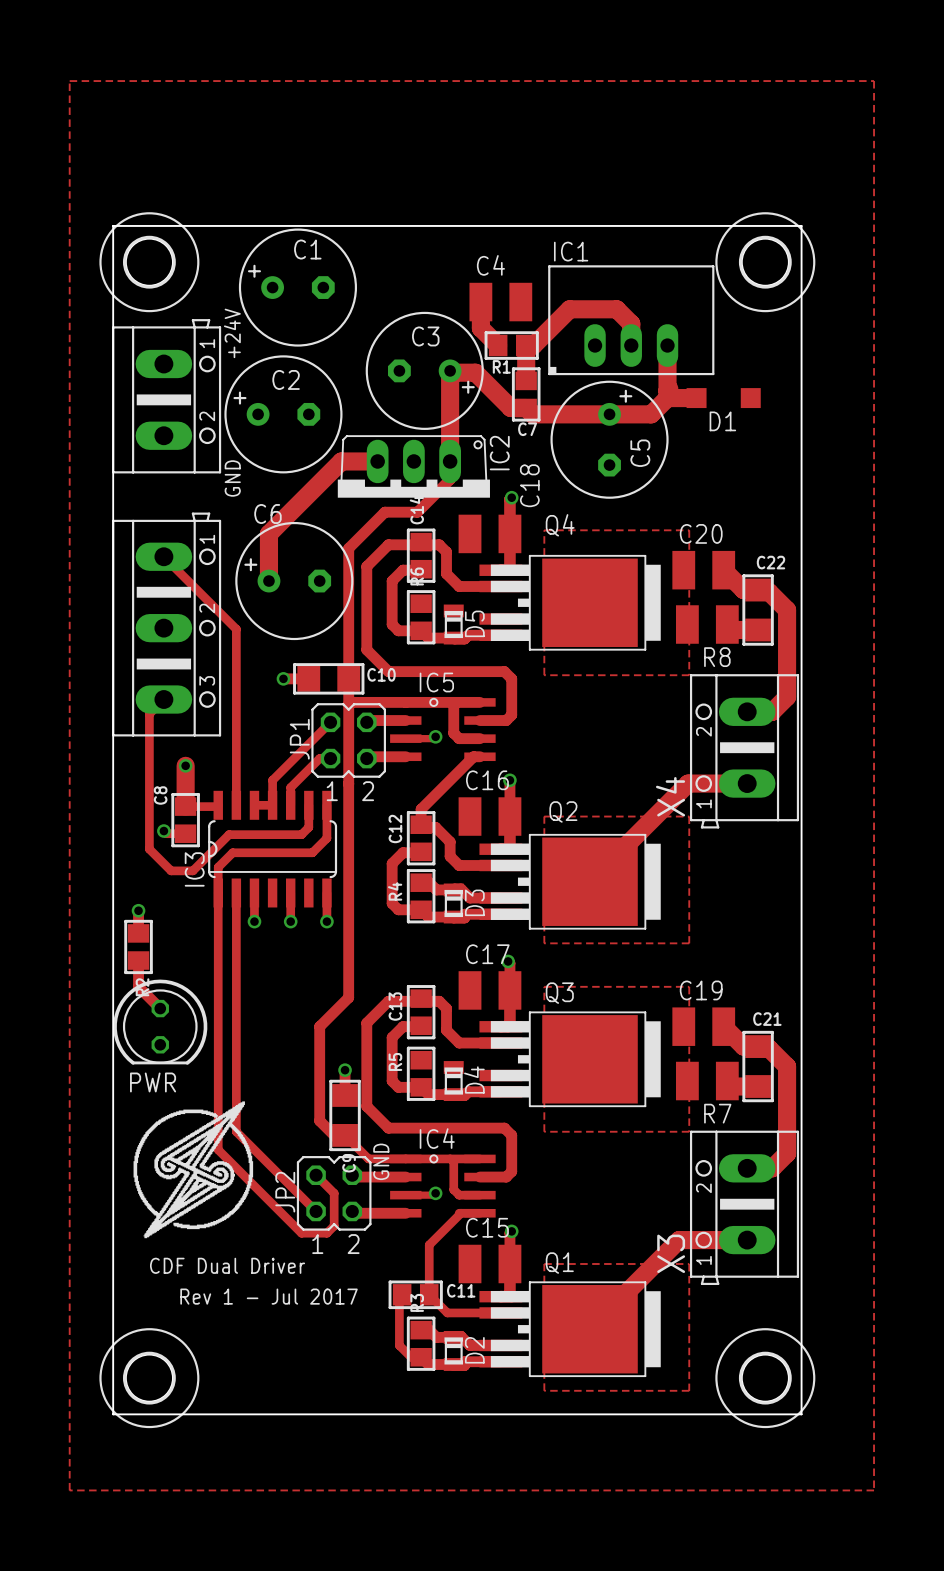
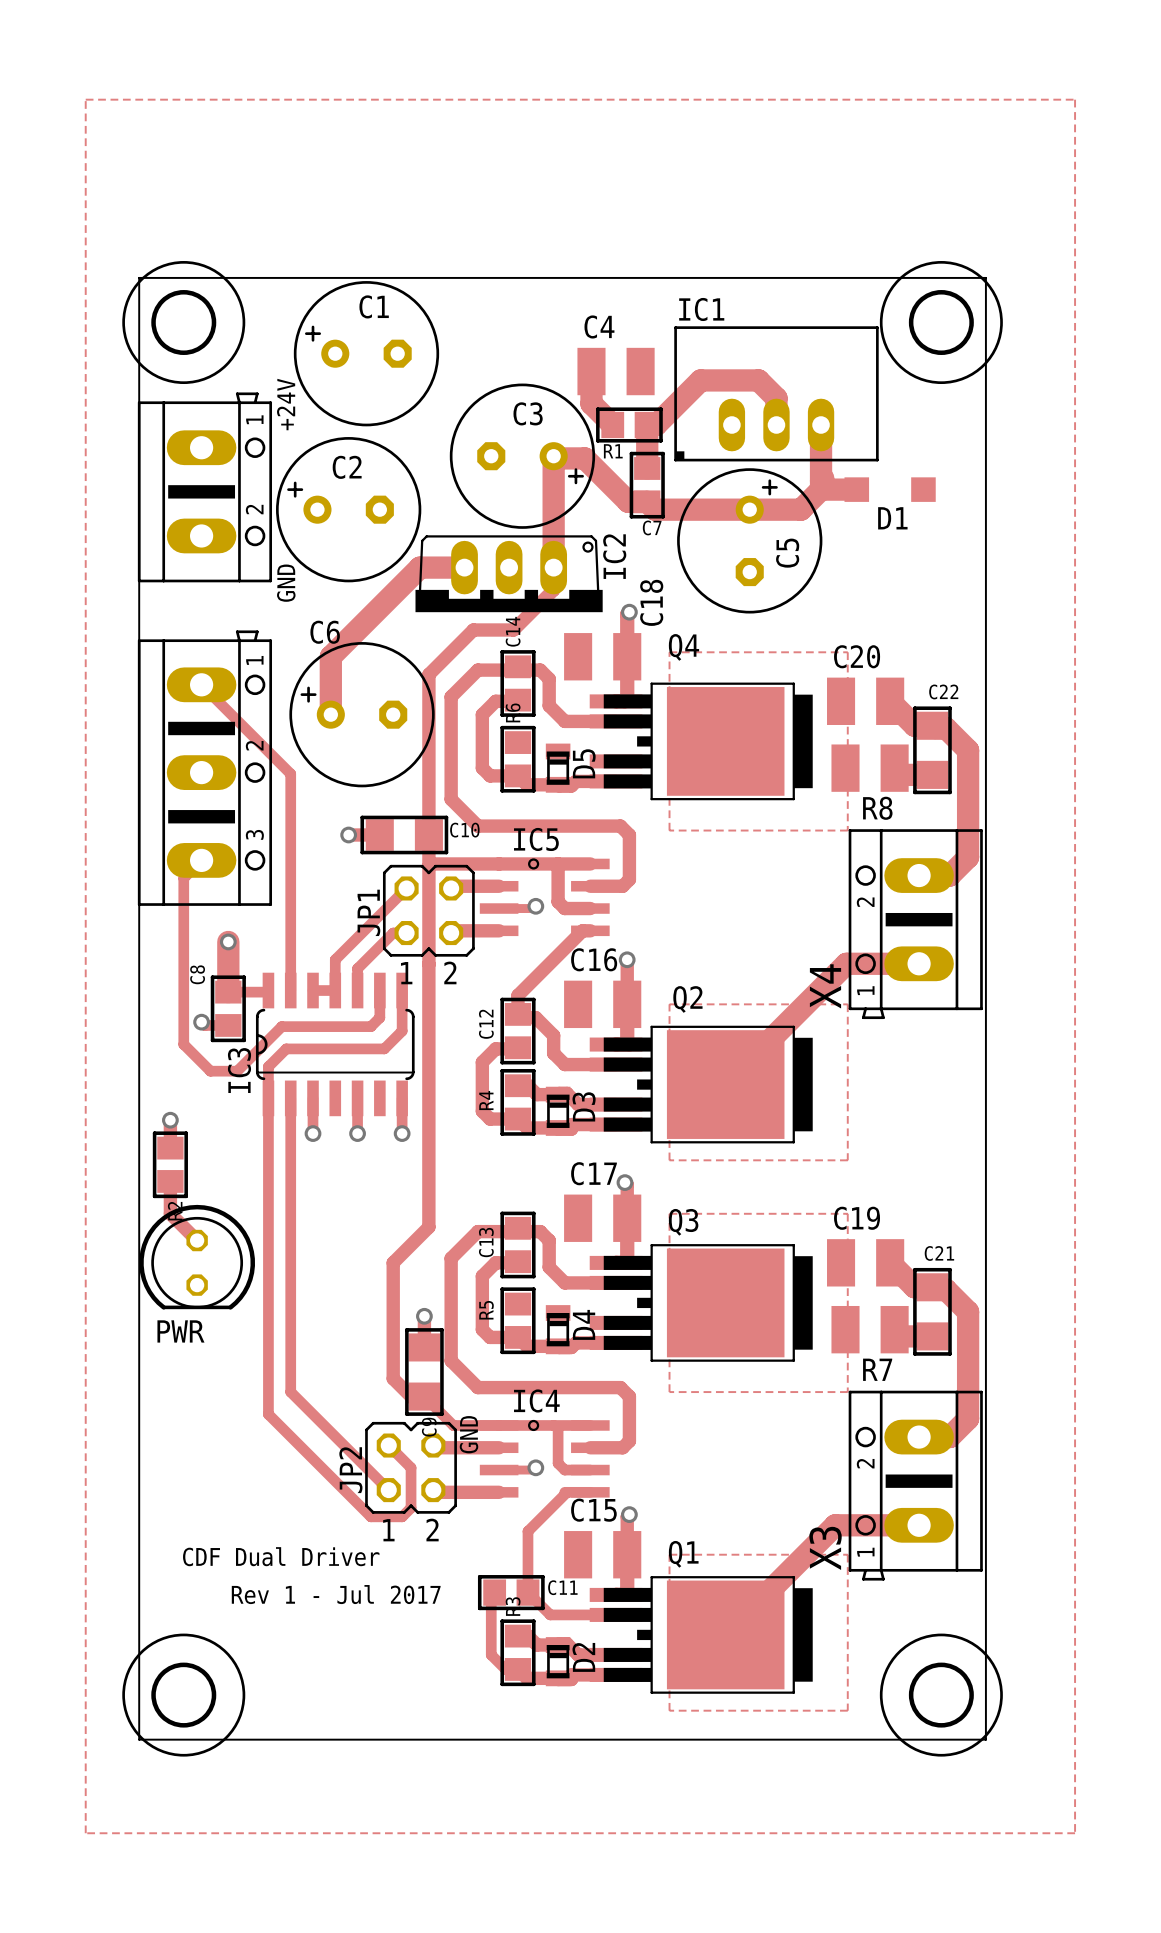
drawing: [133, 1101, 254, 1239] -> none

